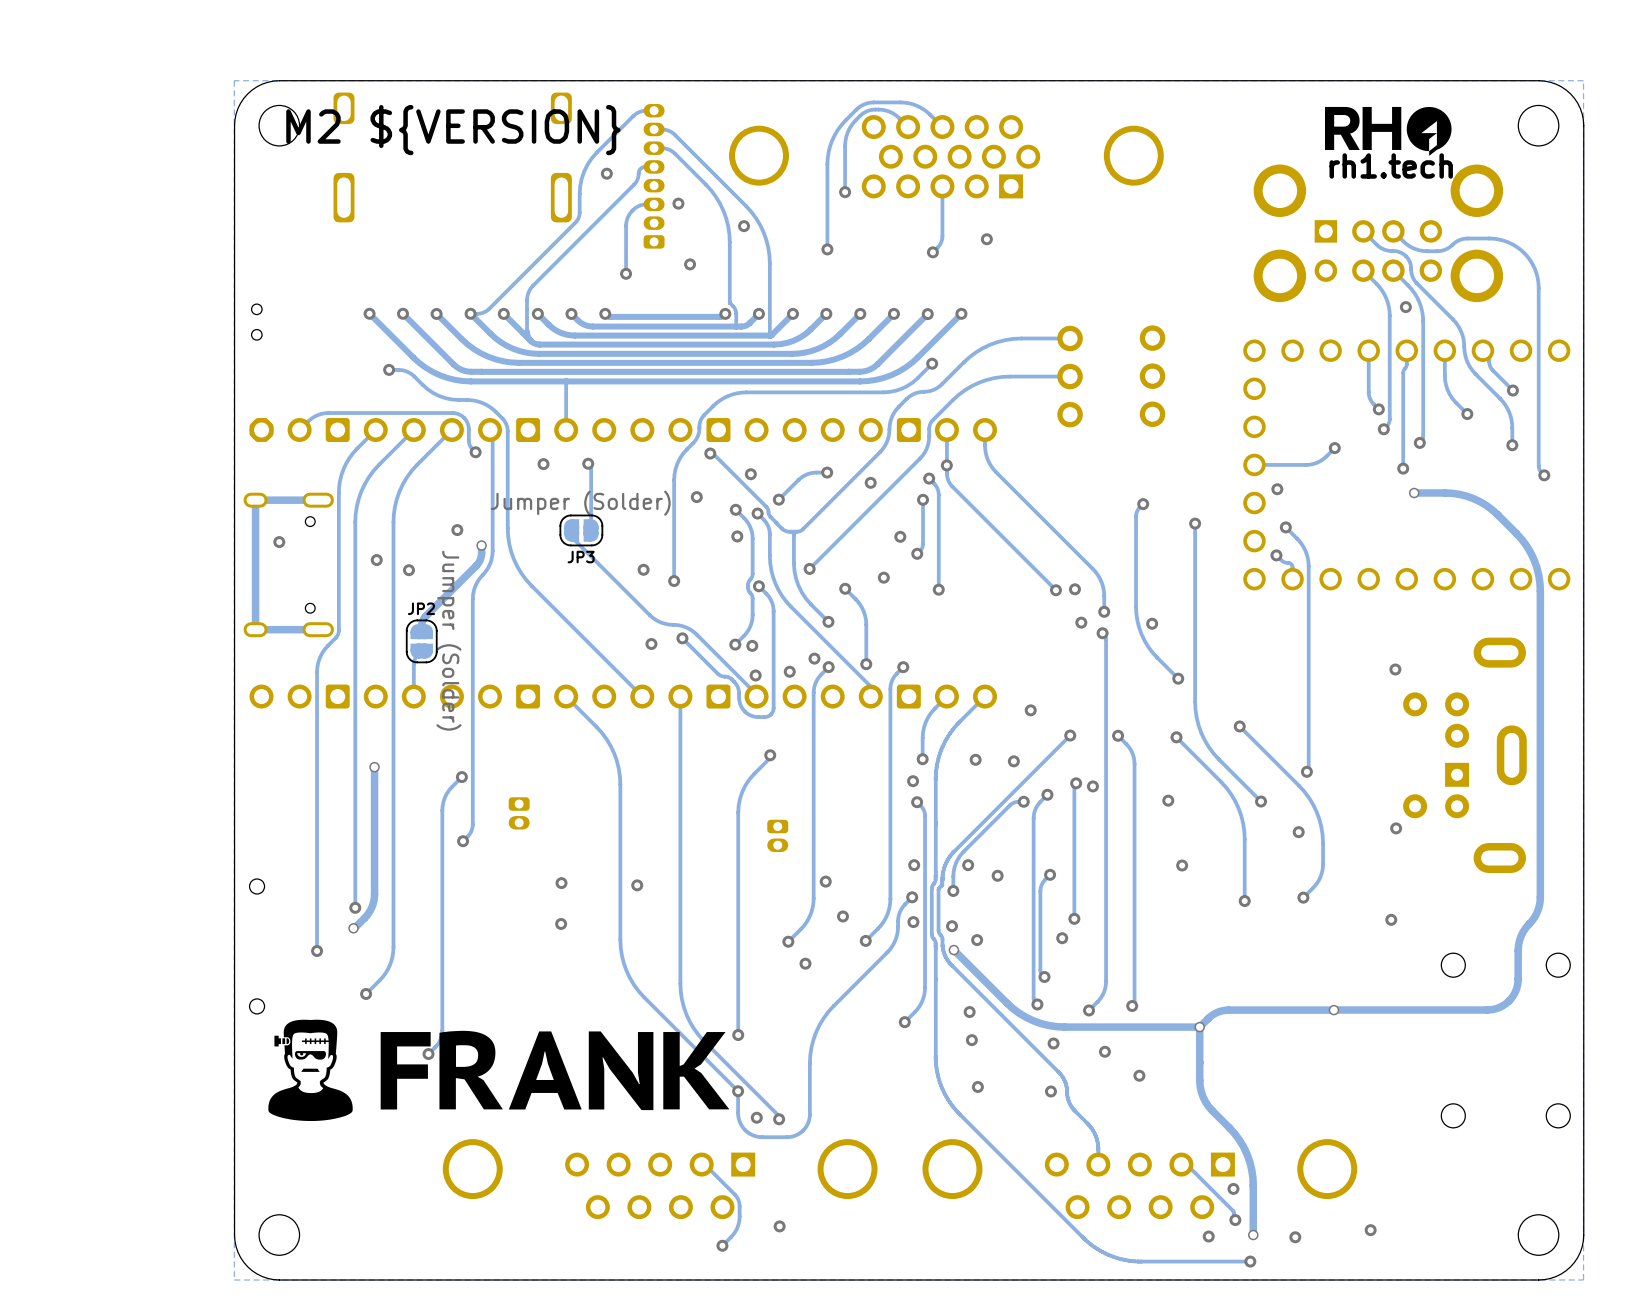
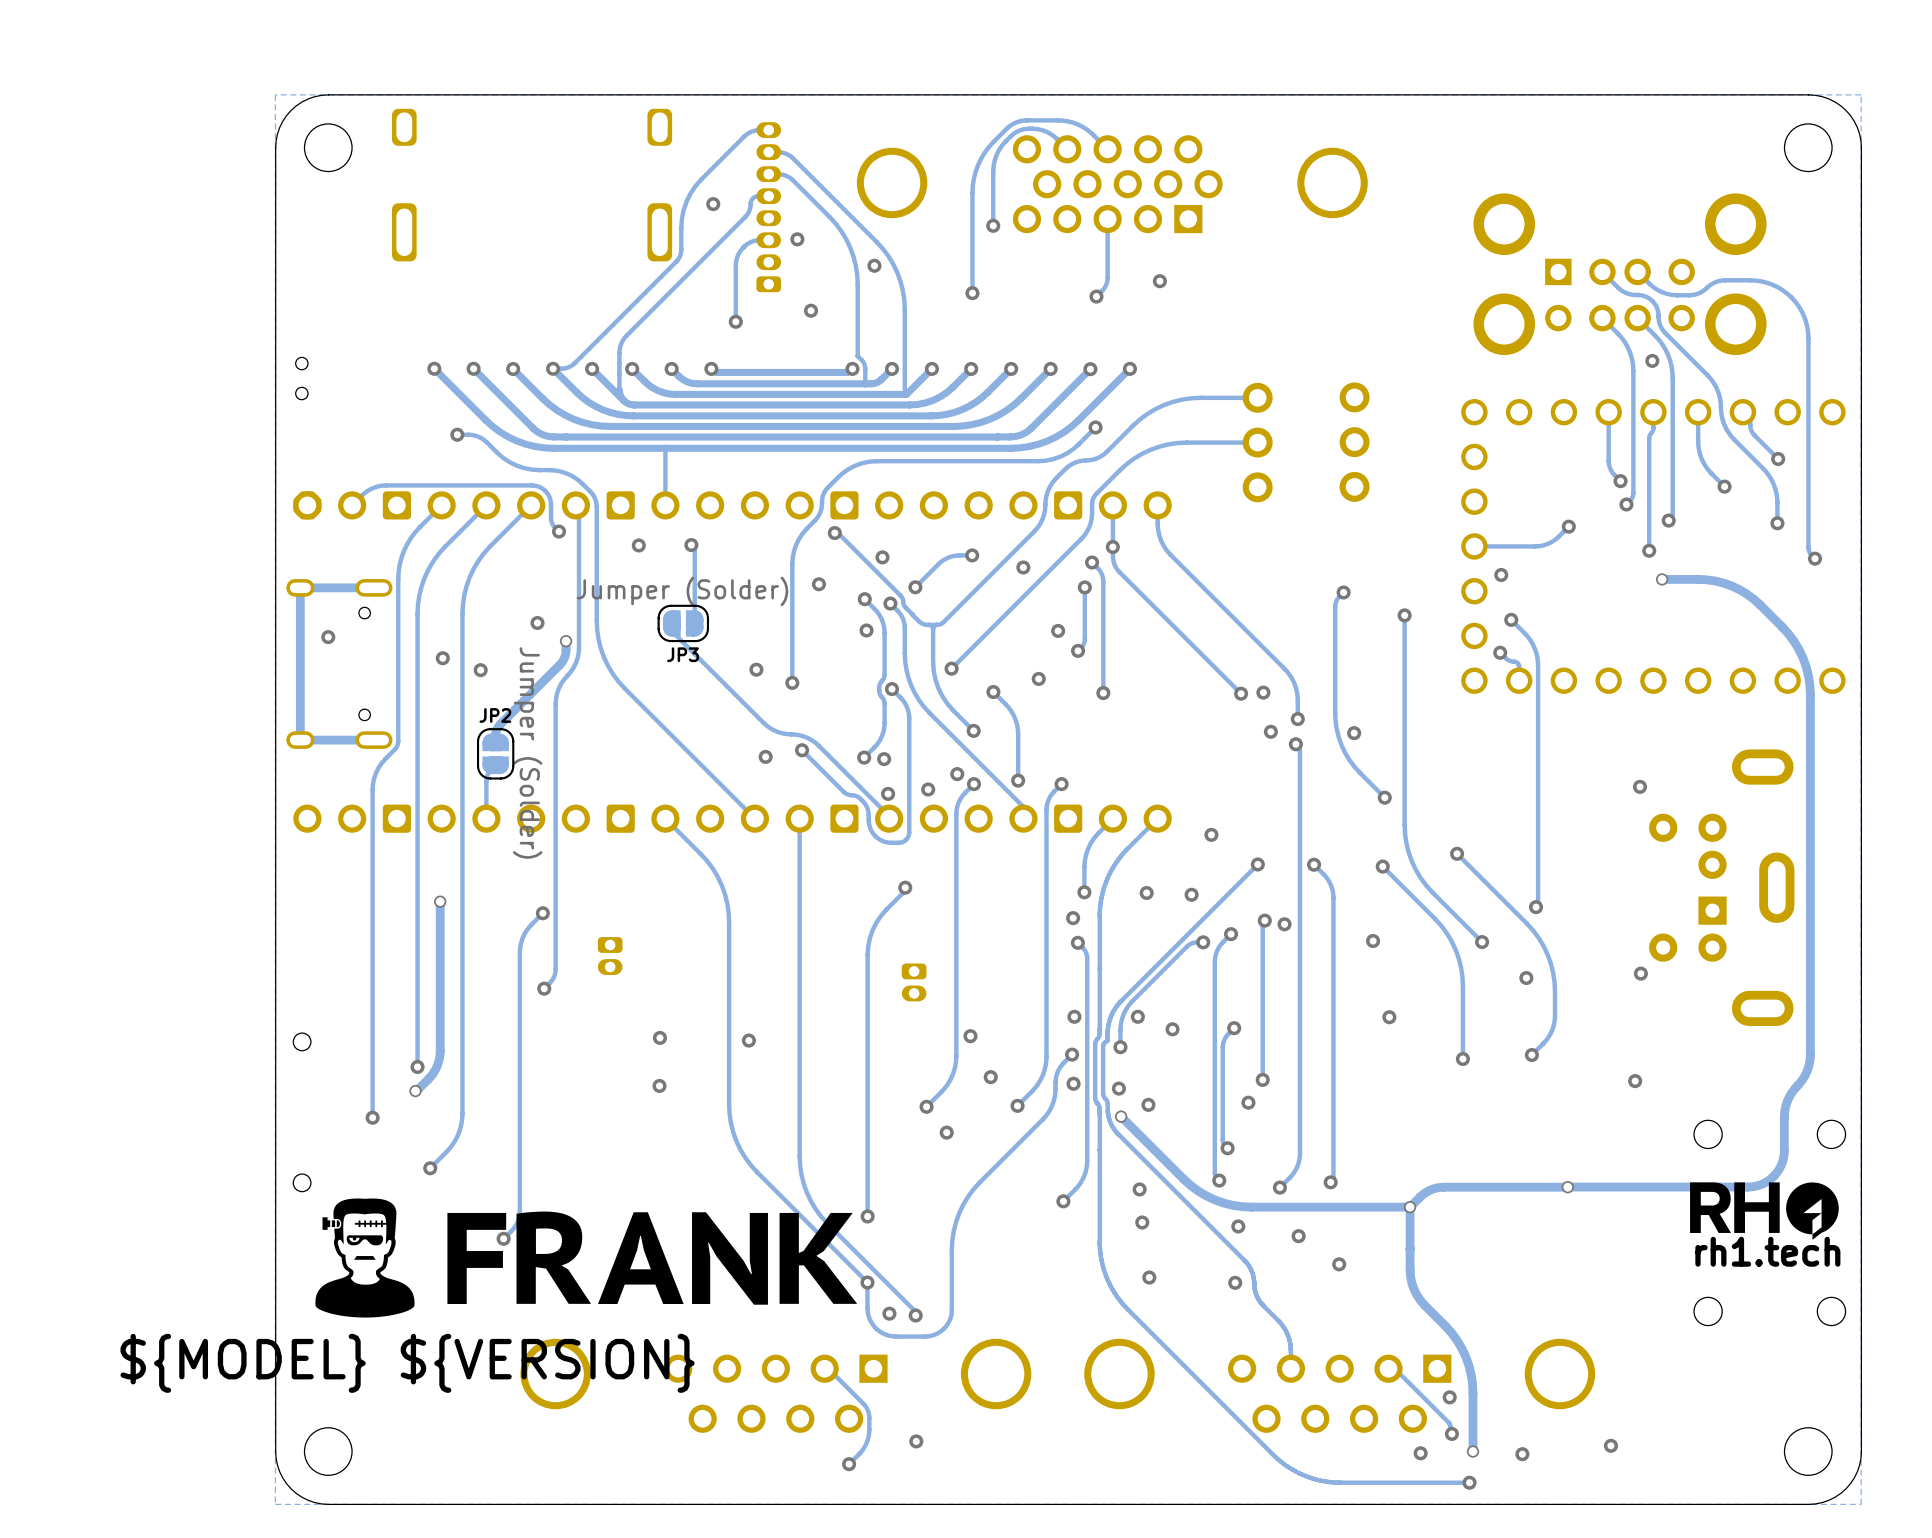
drawing: [1324, 106, 1452, 156] -> none
text: M2 ${VERSION} (453, 130) -> none
text: rh1.tech (1391, 165) -> none
drawing: none -> [1690, 1182, 1839, 1240]
text: none -> rh1.tech (1767, 1251)
text: none -> ${MODEL} ${VERSION} (407, 1363)

